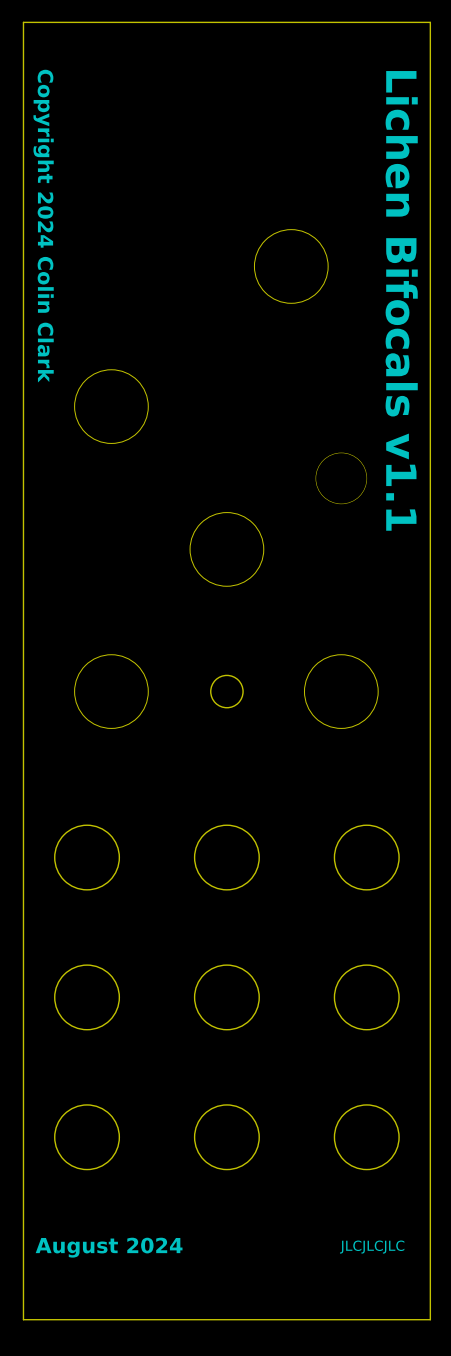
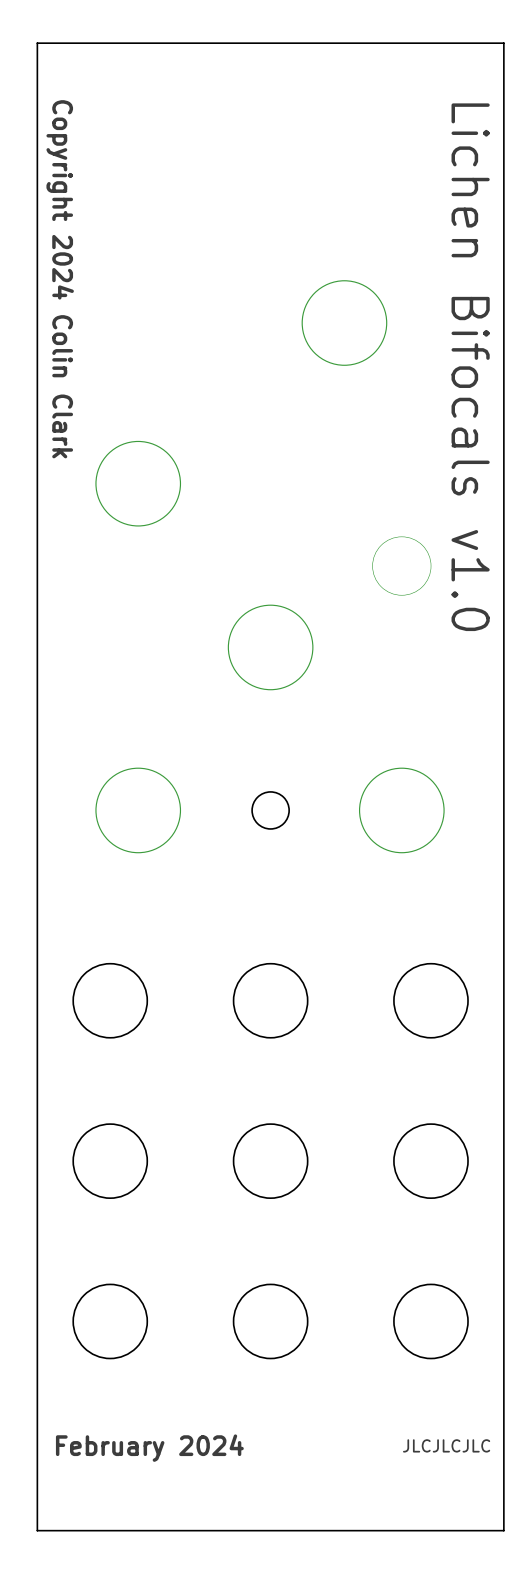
text: Lichen Bifocals v1.1 (401, 300) -> Lichen Bifocals v1.0 (470, 367)
text: August 2024 (109, 1247) -> February 2024 (149, 1448)

